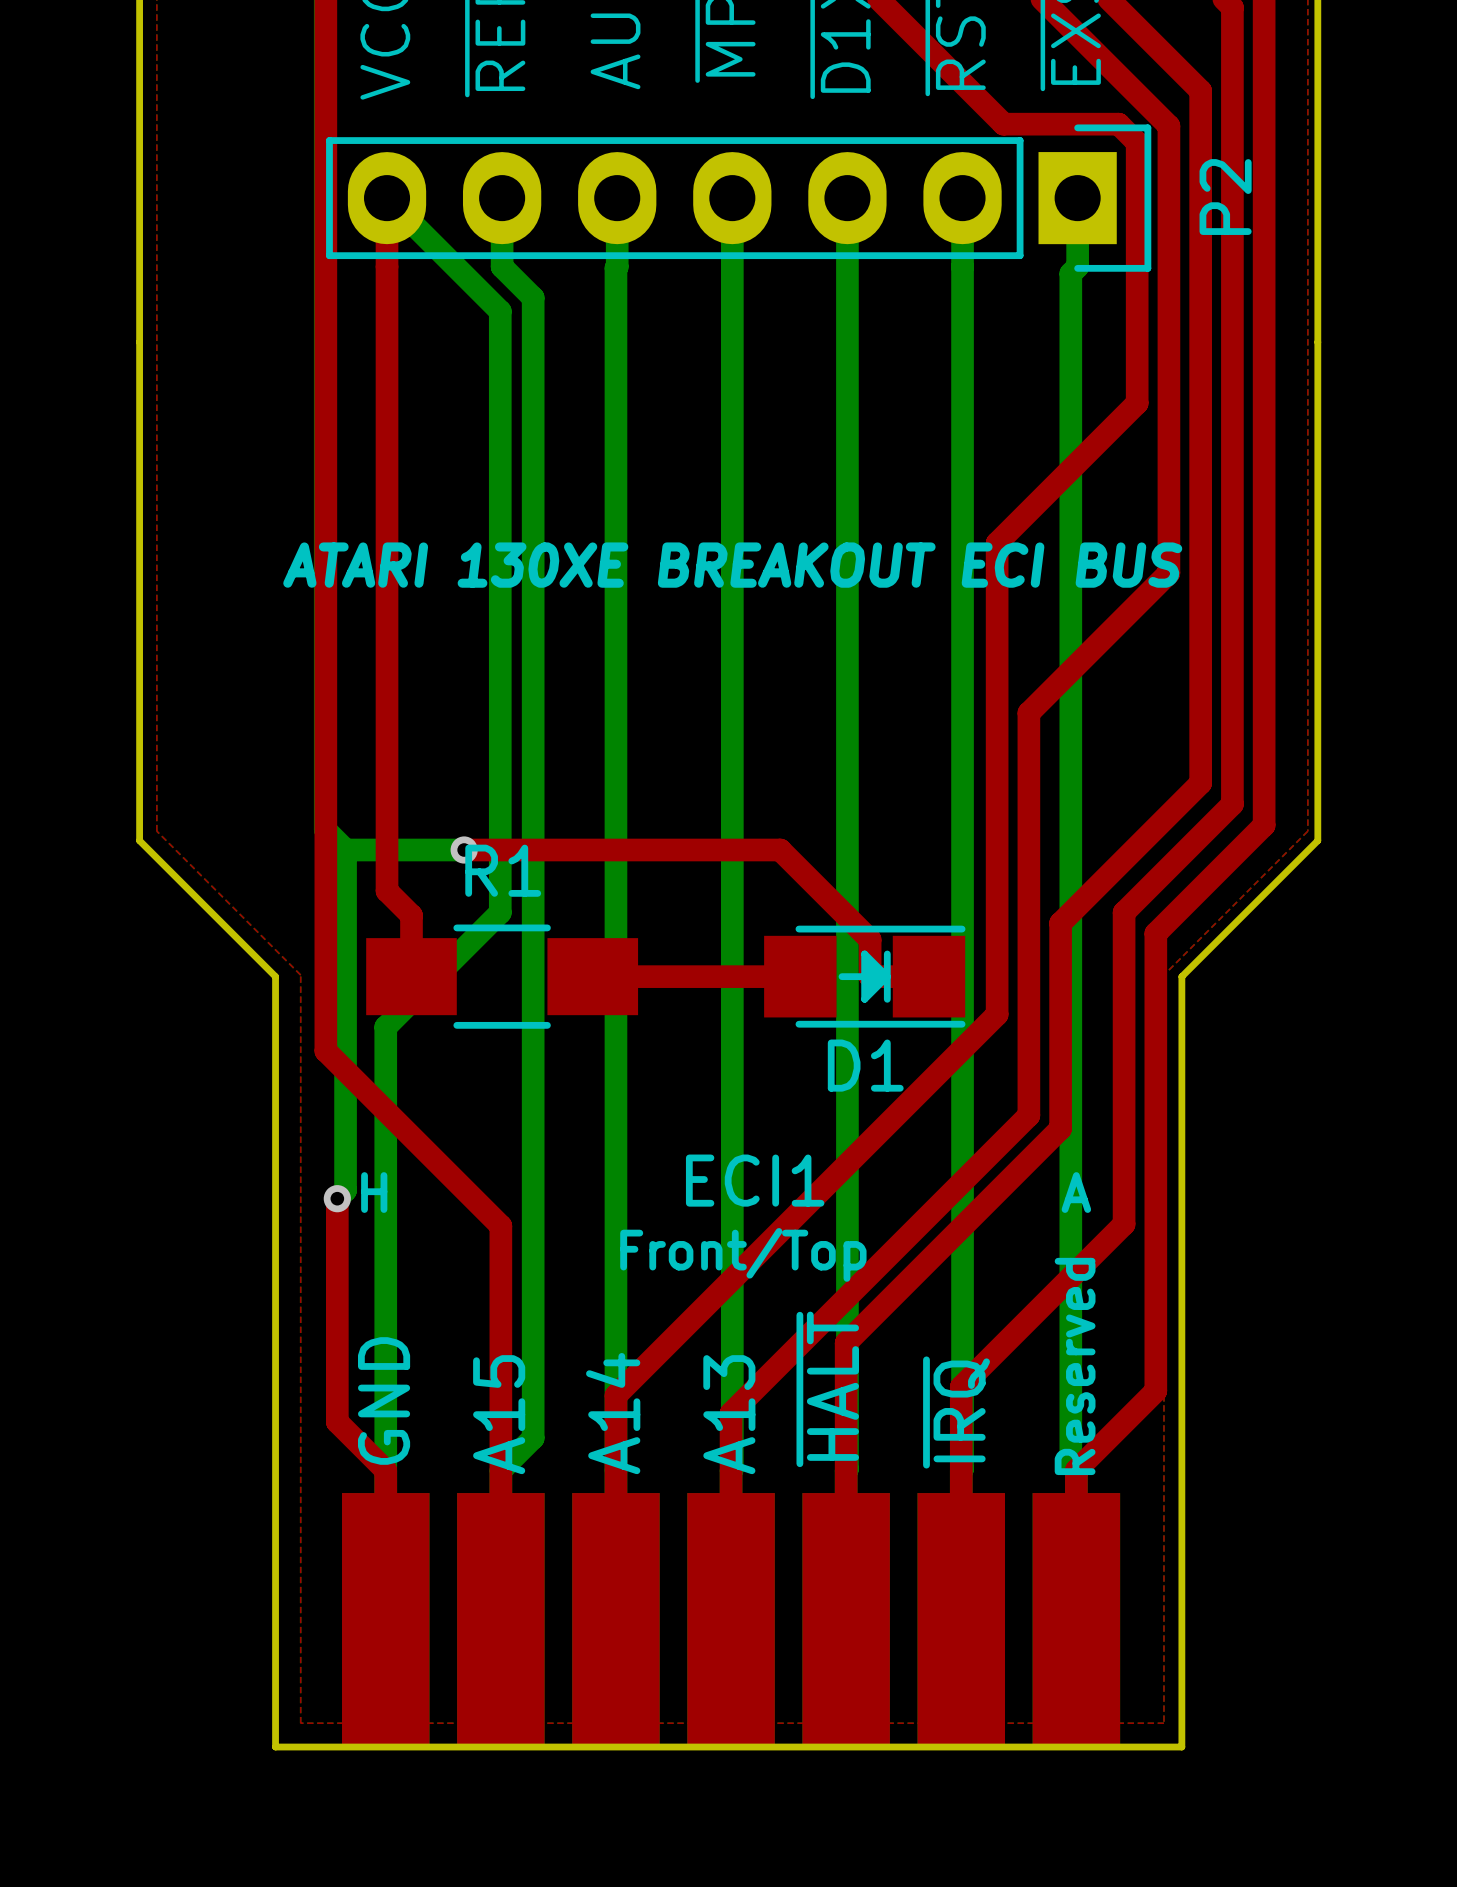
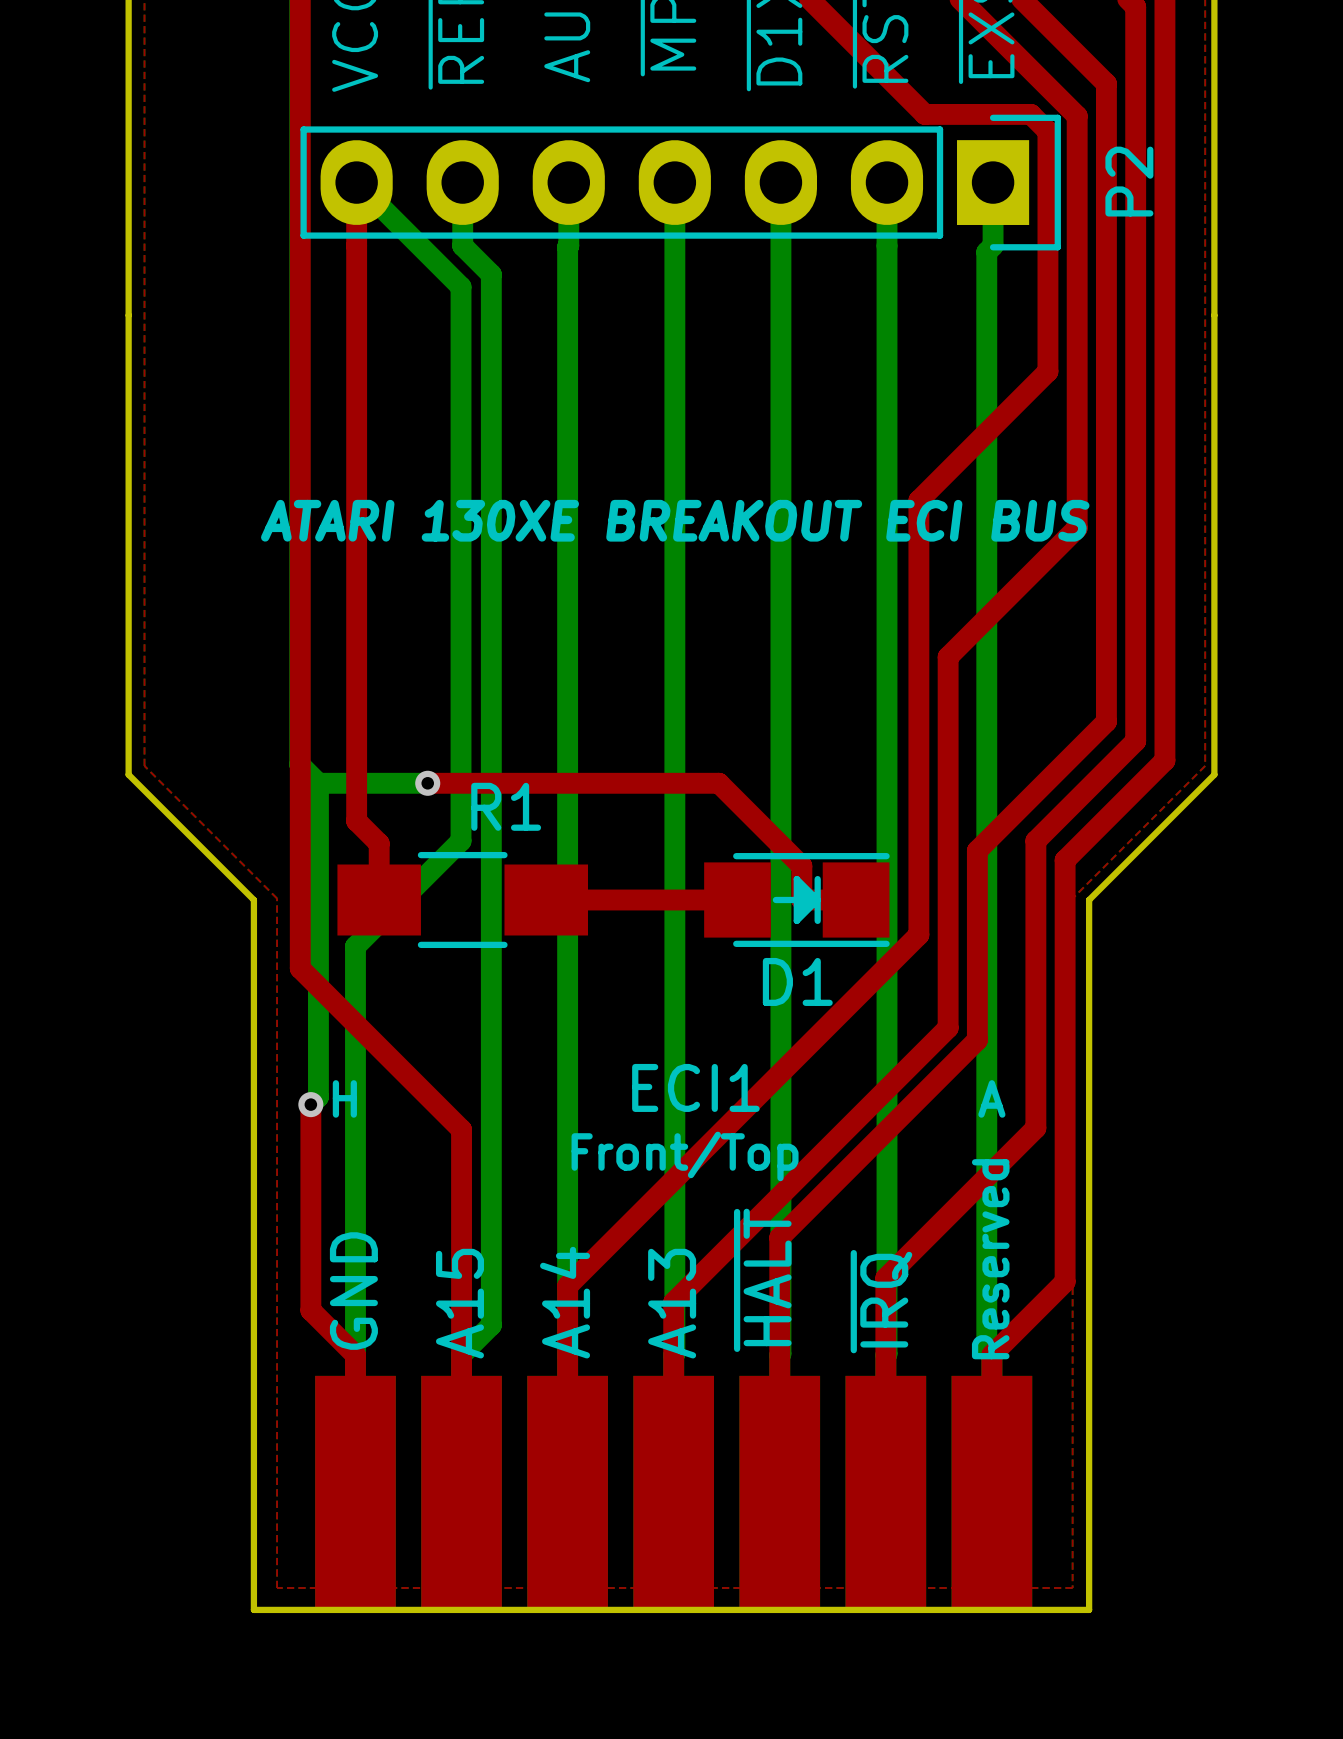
R1 name position: R1 (503, 870) -> R1 (506, 806)

